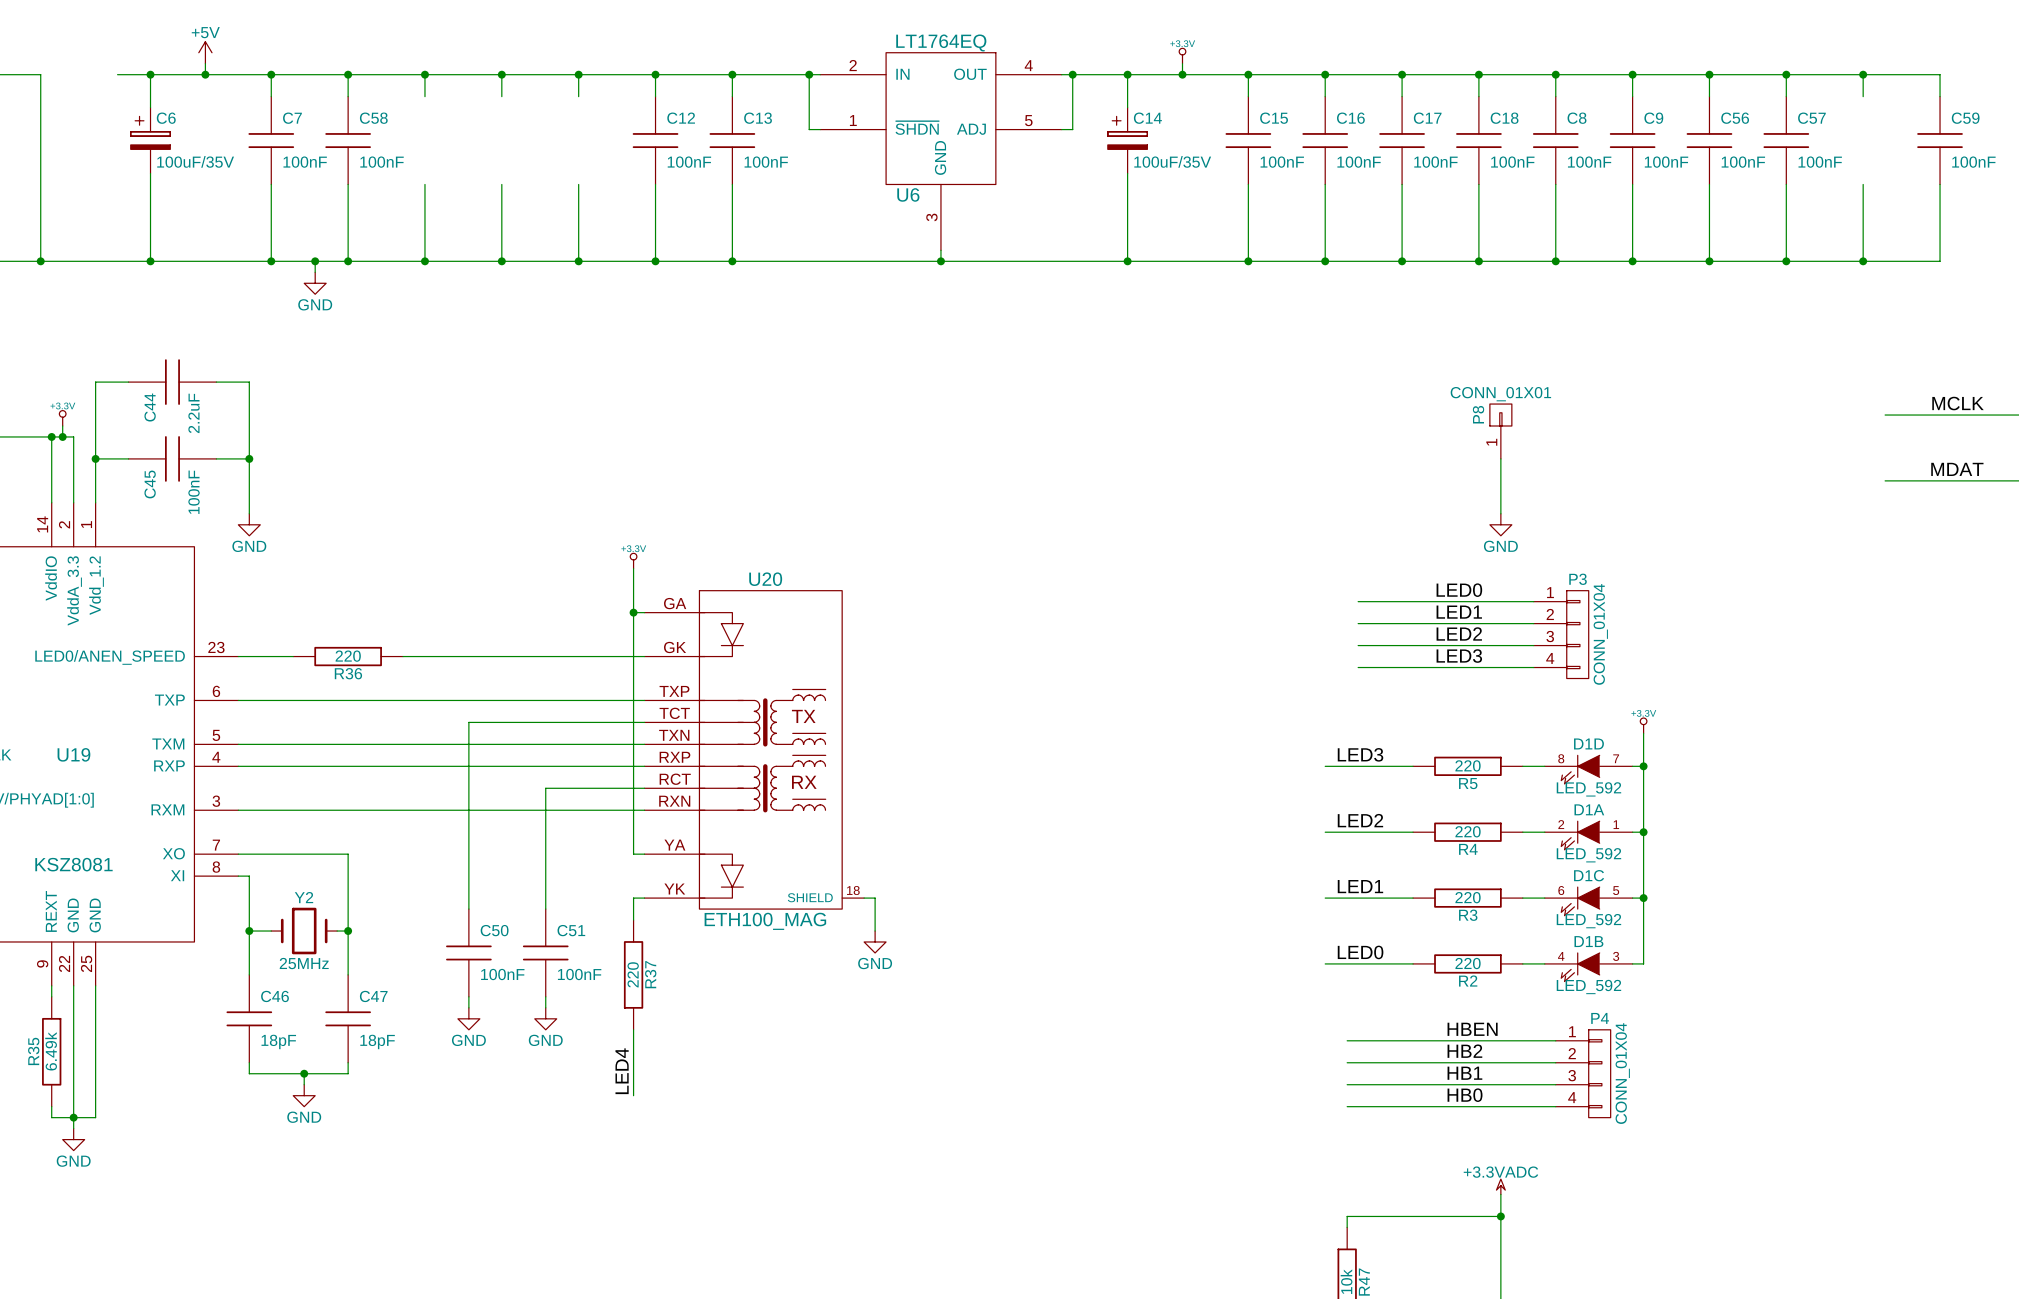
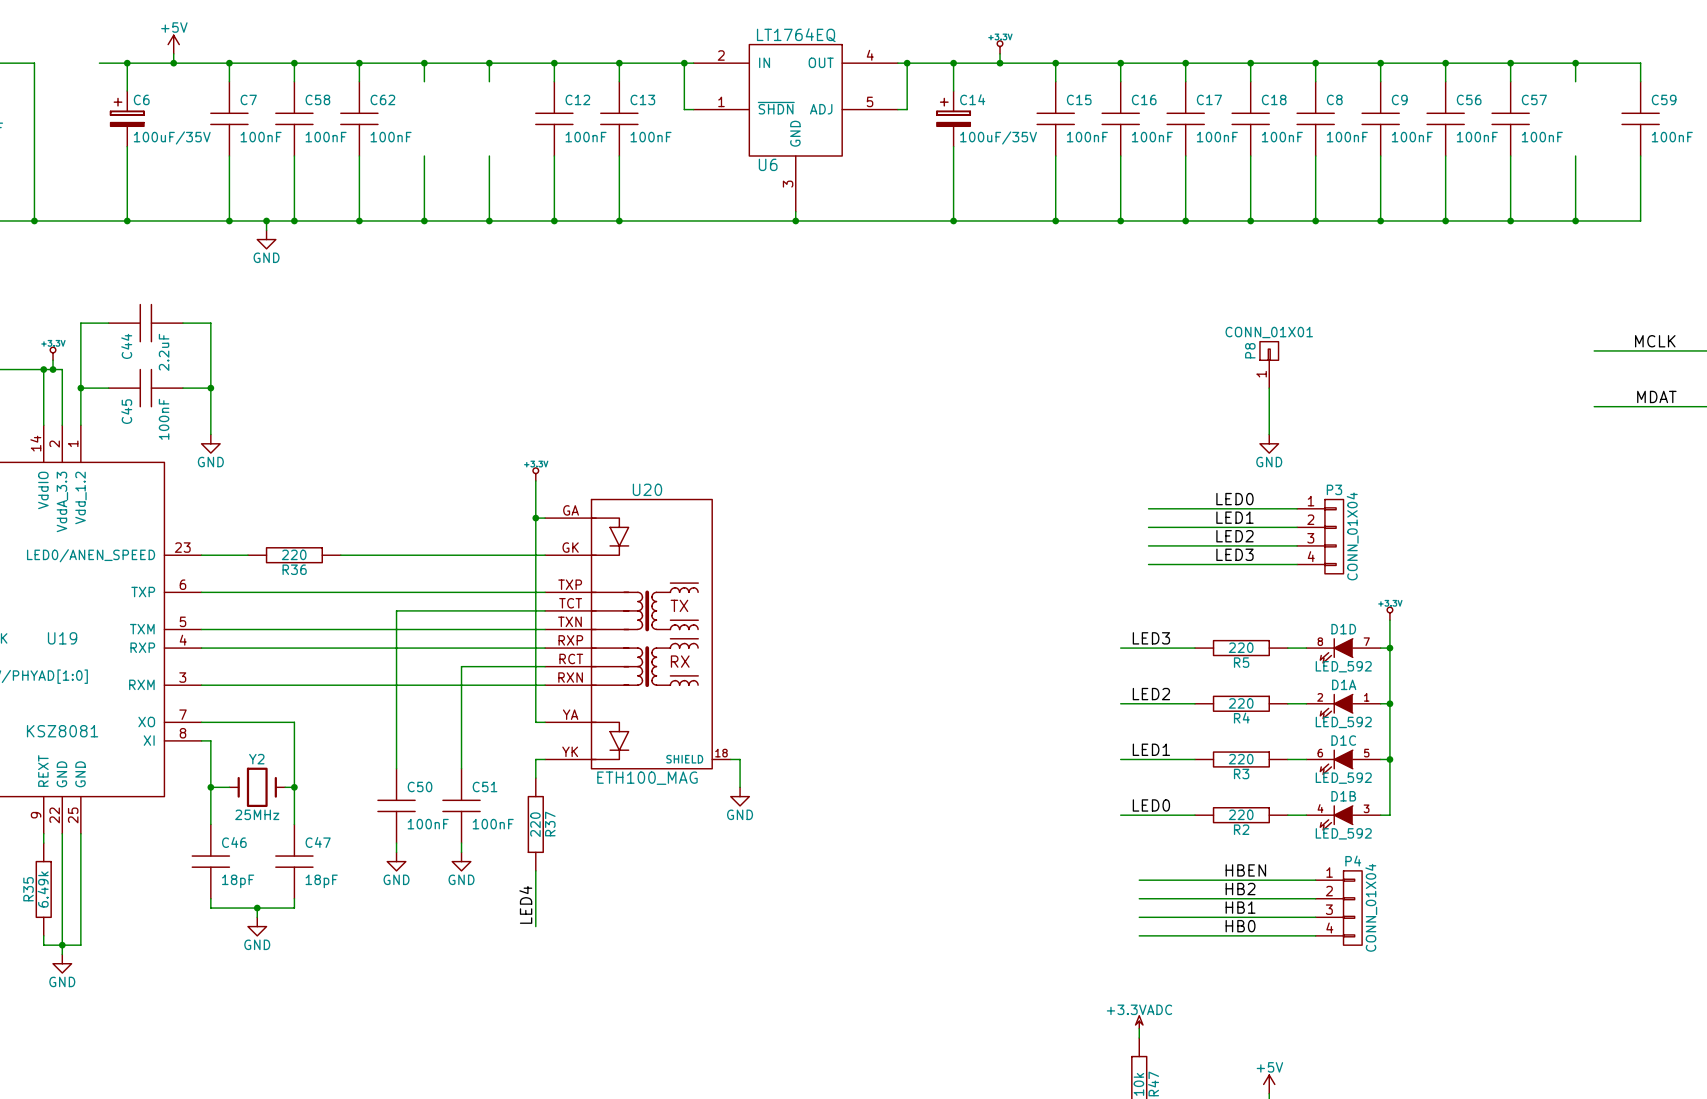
C62: none -> 100nF (359, 118)
power symbol position: +3.3VADC (1500, 1186) -> +3.3VADC (1139, 1022)
wire: (1500, 1194) (1500, 1293) -> none
wire: (1347, 1216) (1500, 1216) -> none
junction: (1500, 1216) -> none
power symbol: none -> +5V (1269, 1084)

